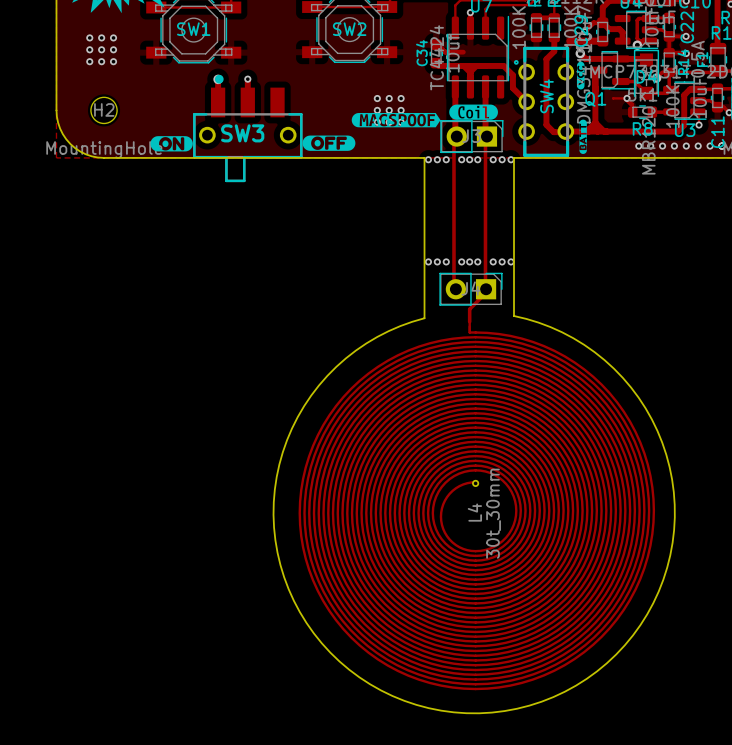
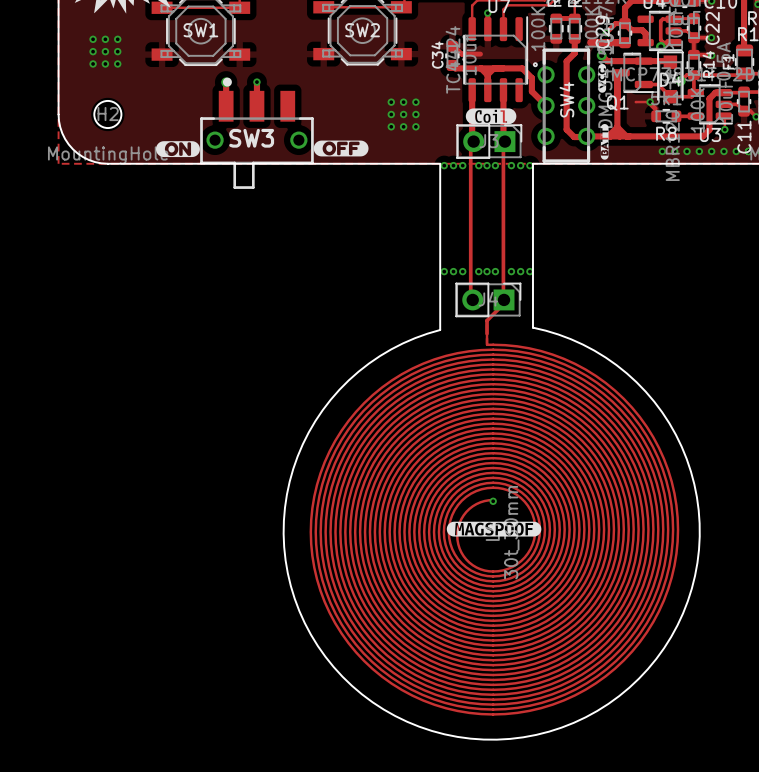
drawing: [351, 112, 441, 128] -> none
drawing: none -> [446, 521, 542, 537]

